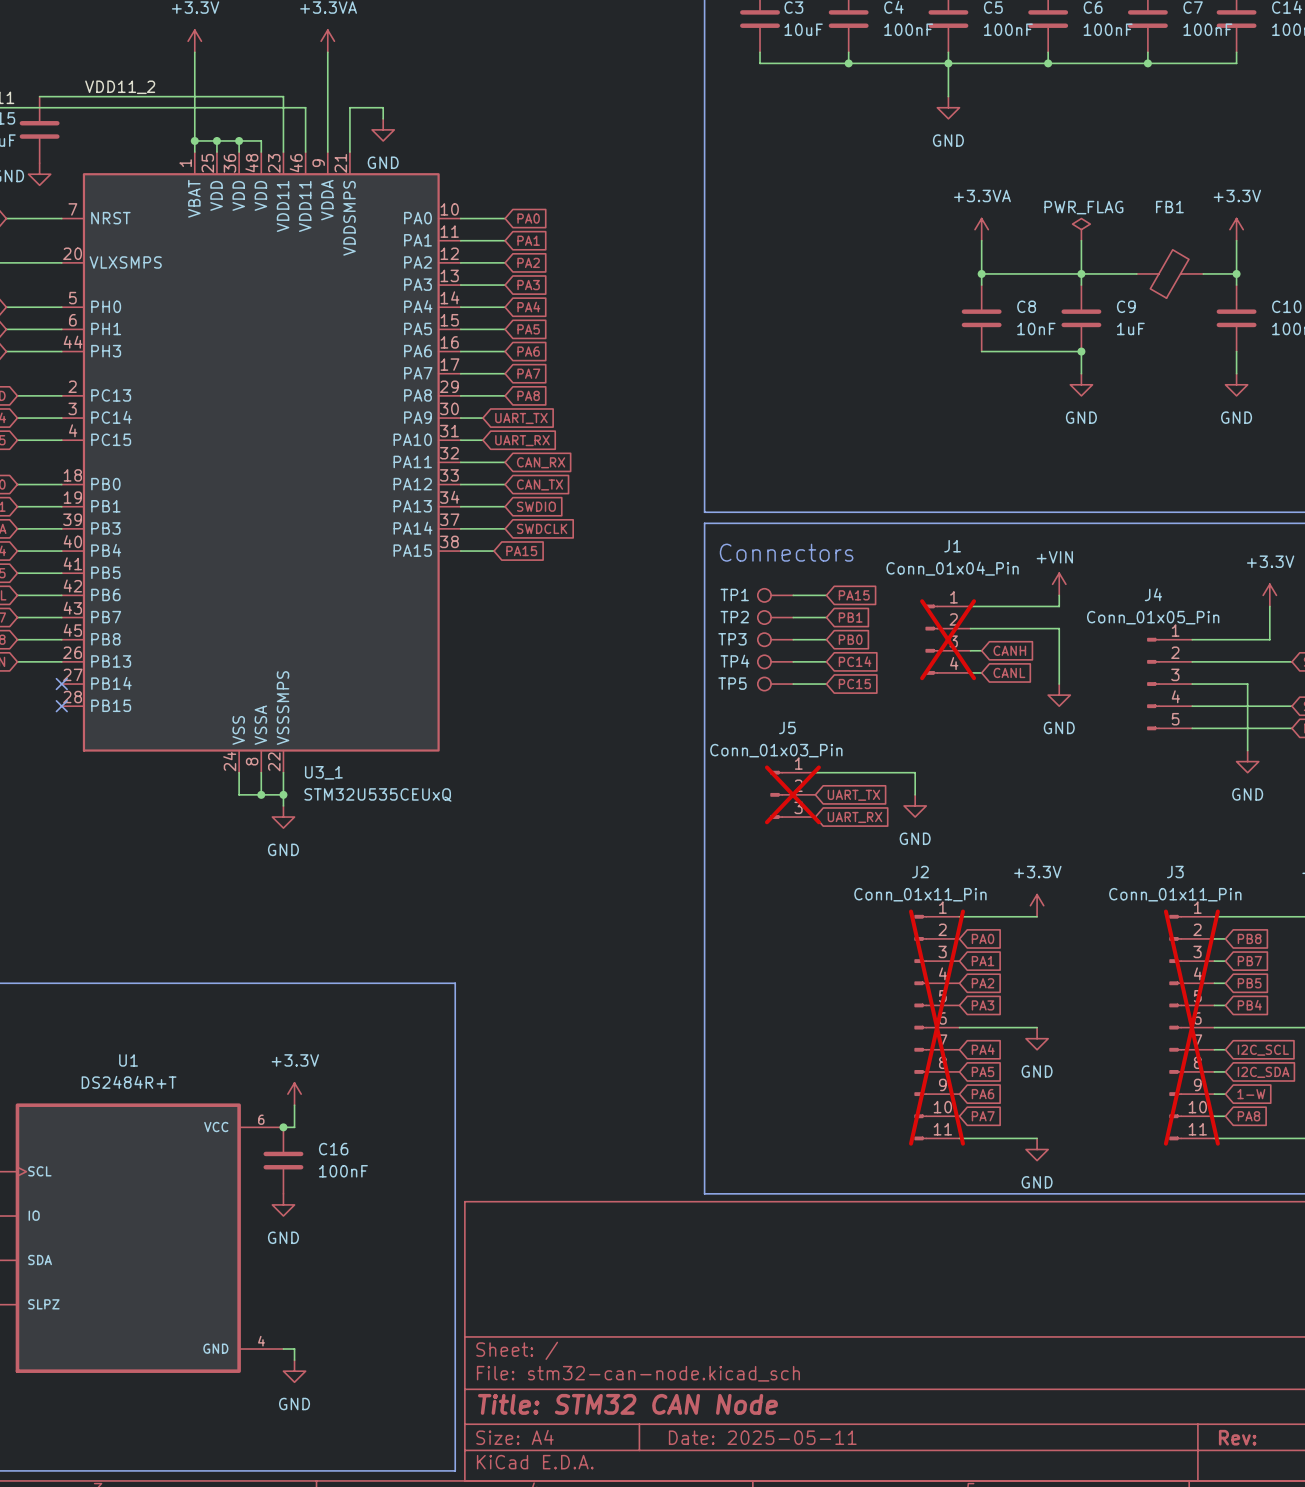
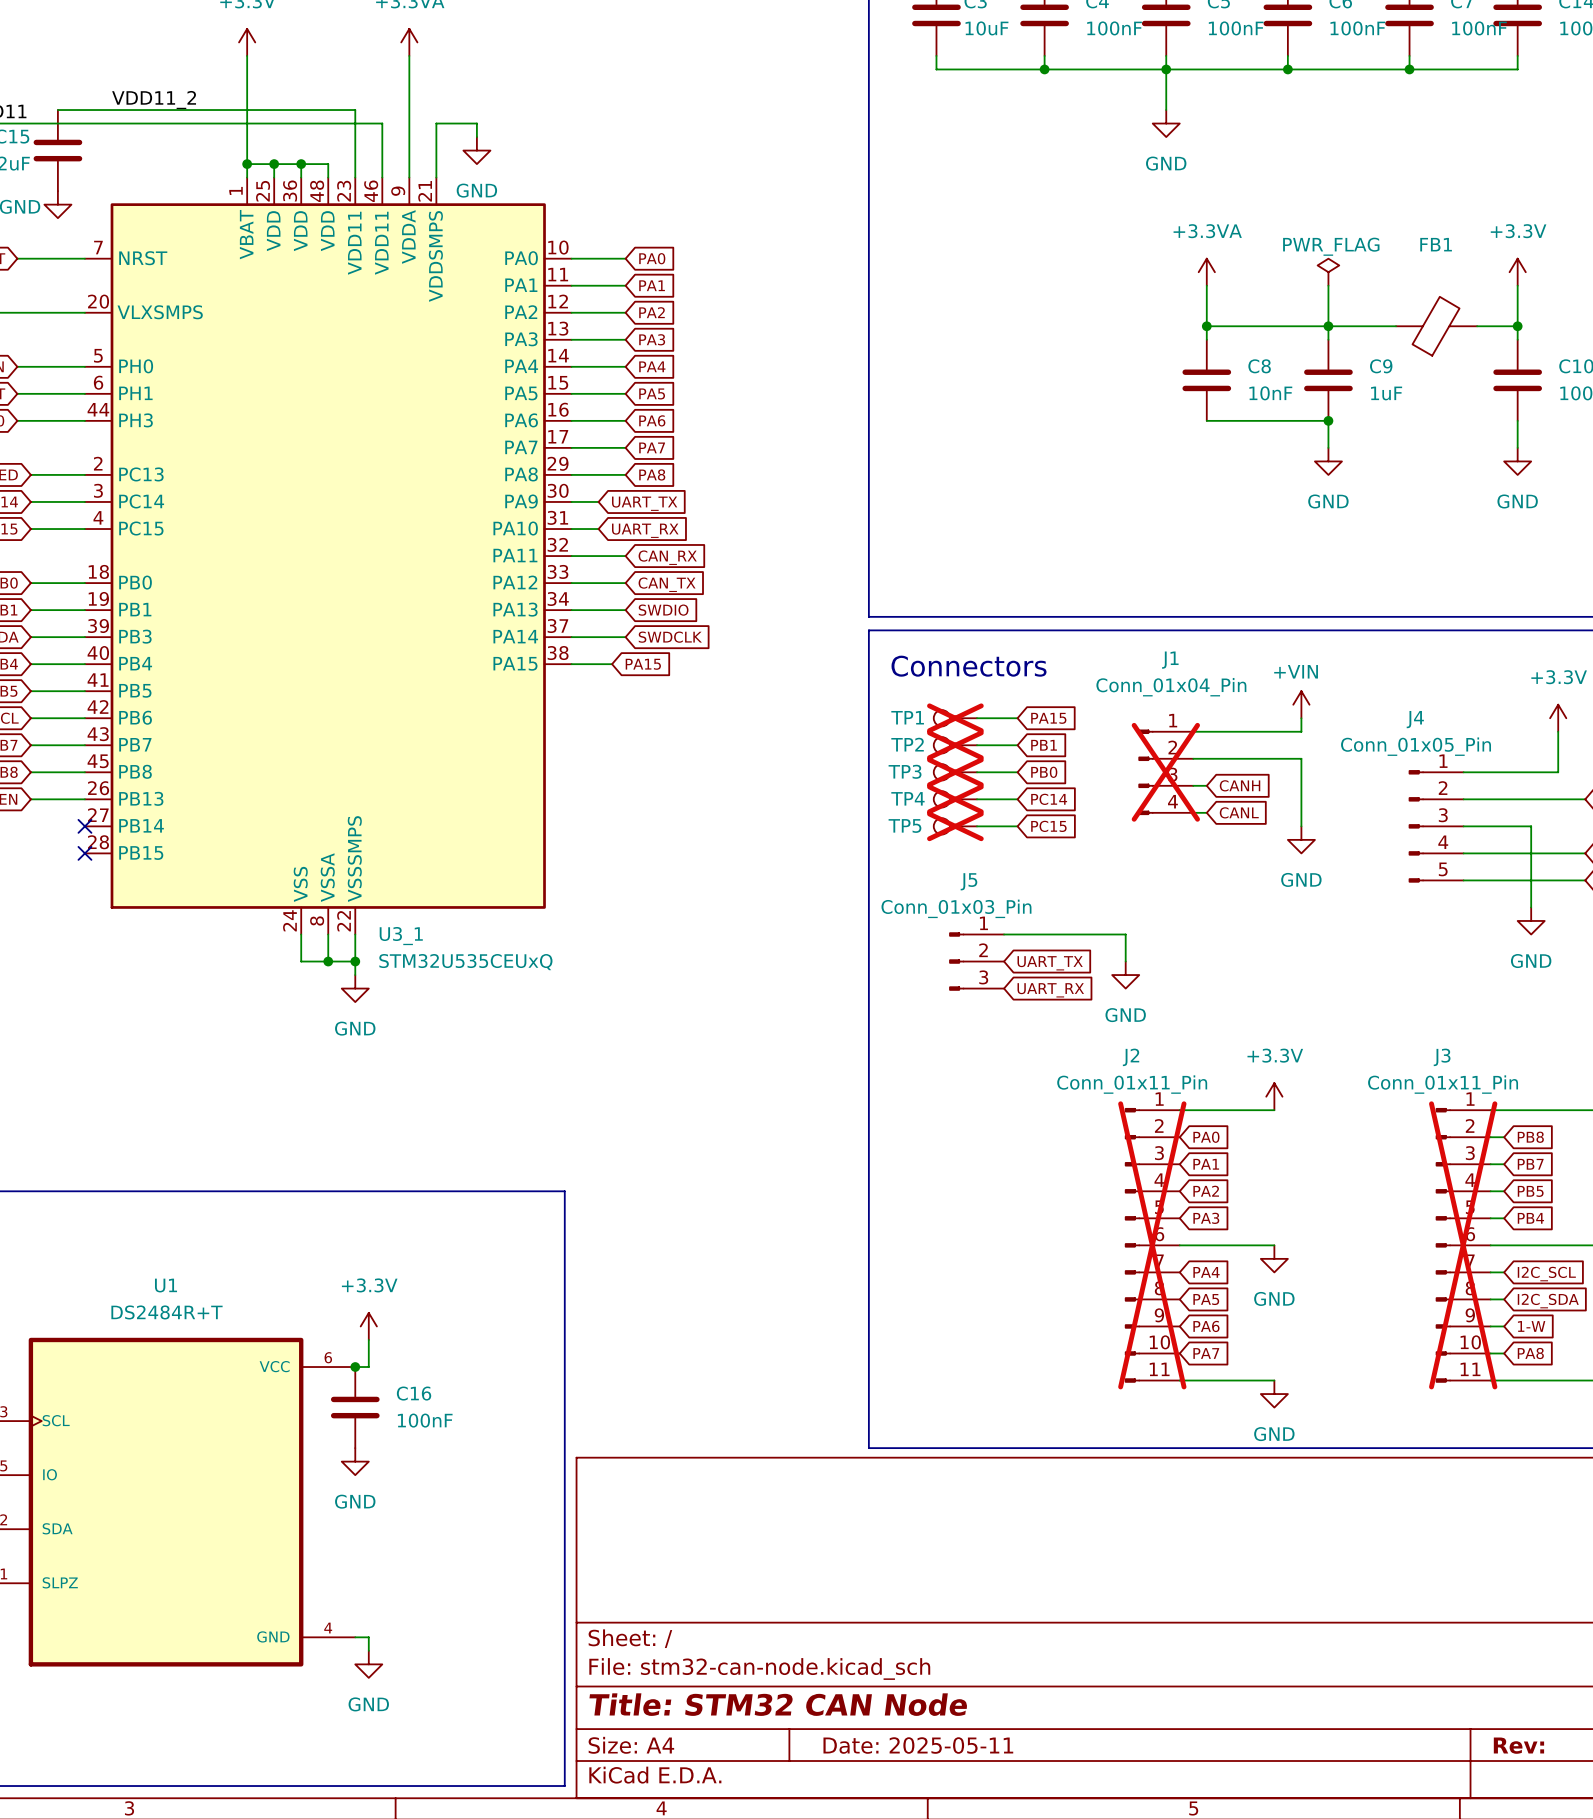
TP1 do-not-place cross: none -> (955, 718)
TP2 do-not-place cross: none -> (955, 745)
TP3 do-not-place cross: none -> (955, 772)
TP4 do-not-place cross: none -> (955, 799)
TP5 do-not-place cross: none -> (955, 826)
J5 do-not-place cross: (792, 794) -> none

